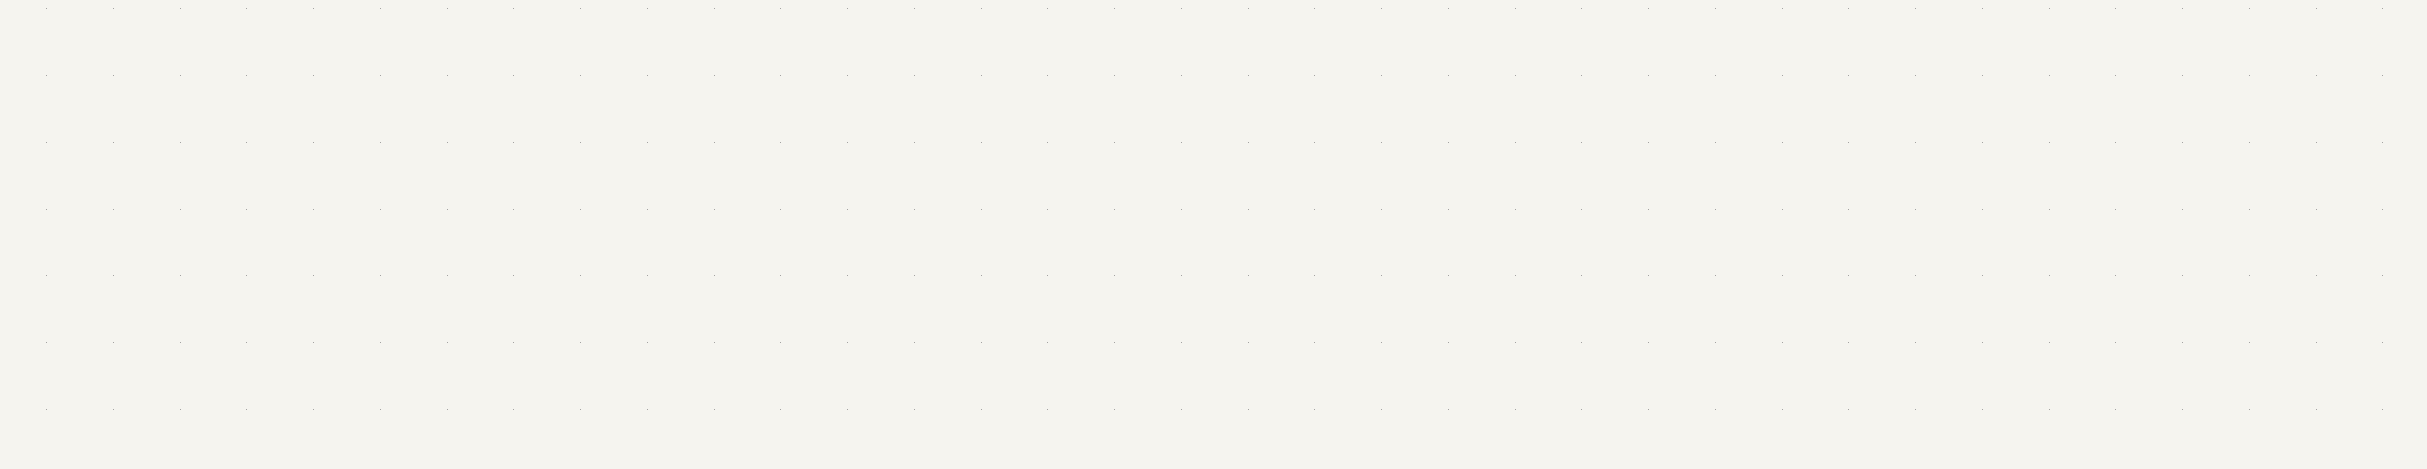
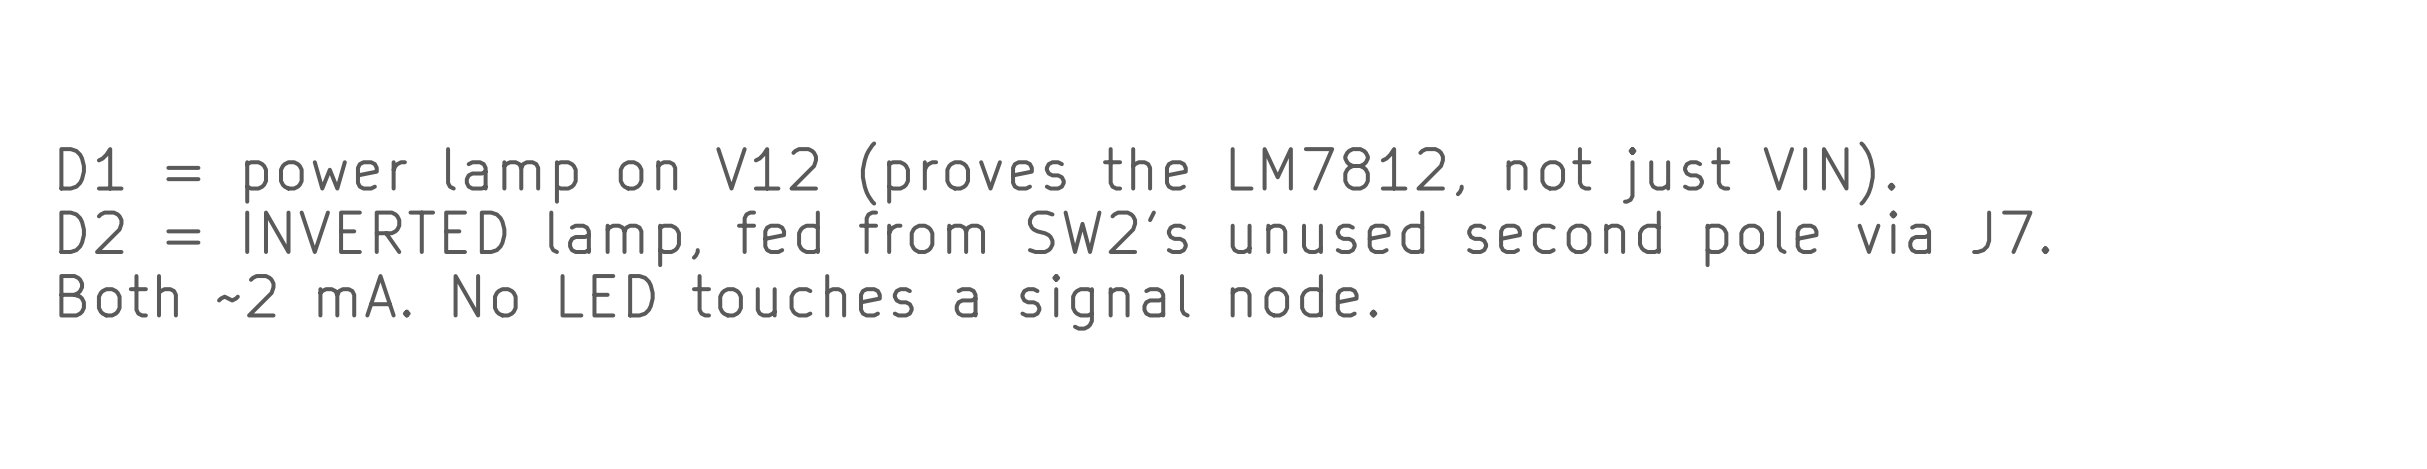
text: none -> D1 = power lamp on V12 (proves the LM7812, not just VIN). (977, 173)
text: none -> D2 = INVERTED lamp, fed from SW2's unused second pole via J7. (1054, 238)
text: none -> Both ~2 mA. No LED touches a signal node. (718, 302)

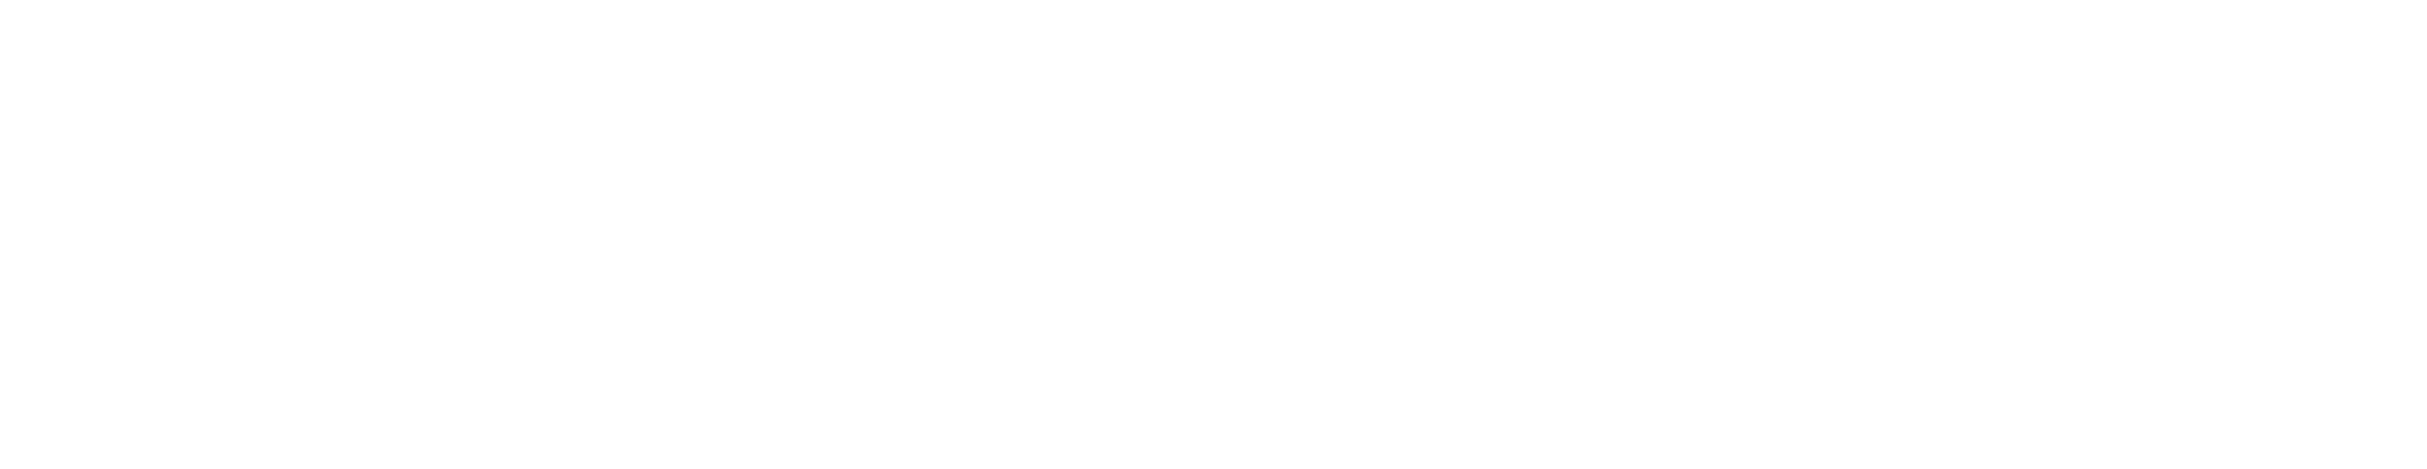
text: D1 = power lamp on V12 (proves the LM7812, not just VIN). (977, 173) -> none
text: D2 = INVERTED lamp, fed from SW2's unused second pole via J7. (1054, 238) -> none
text: Both ~2 mA. No LED touches a signal node. (718, 302) -> none

